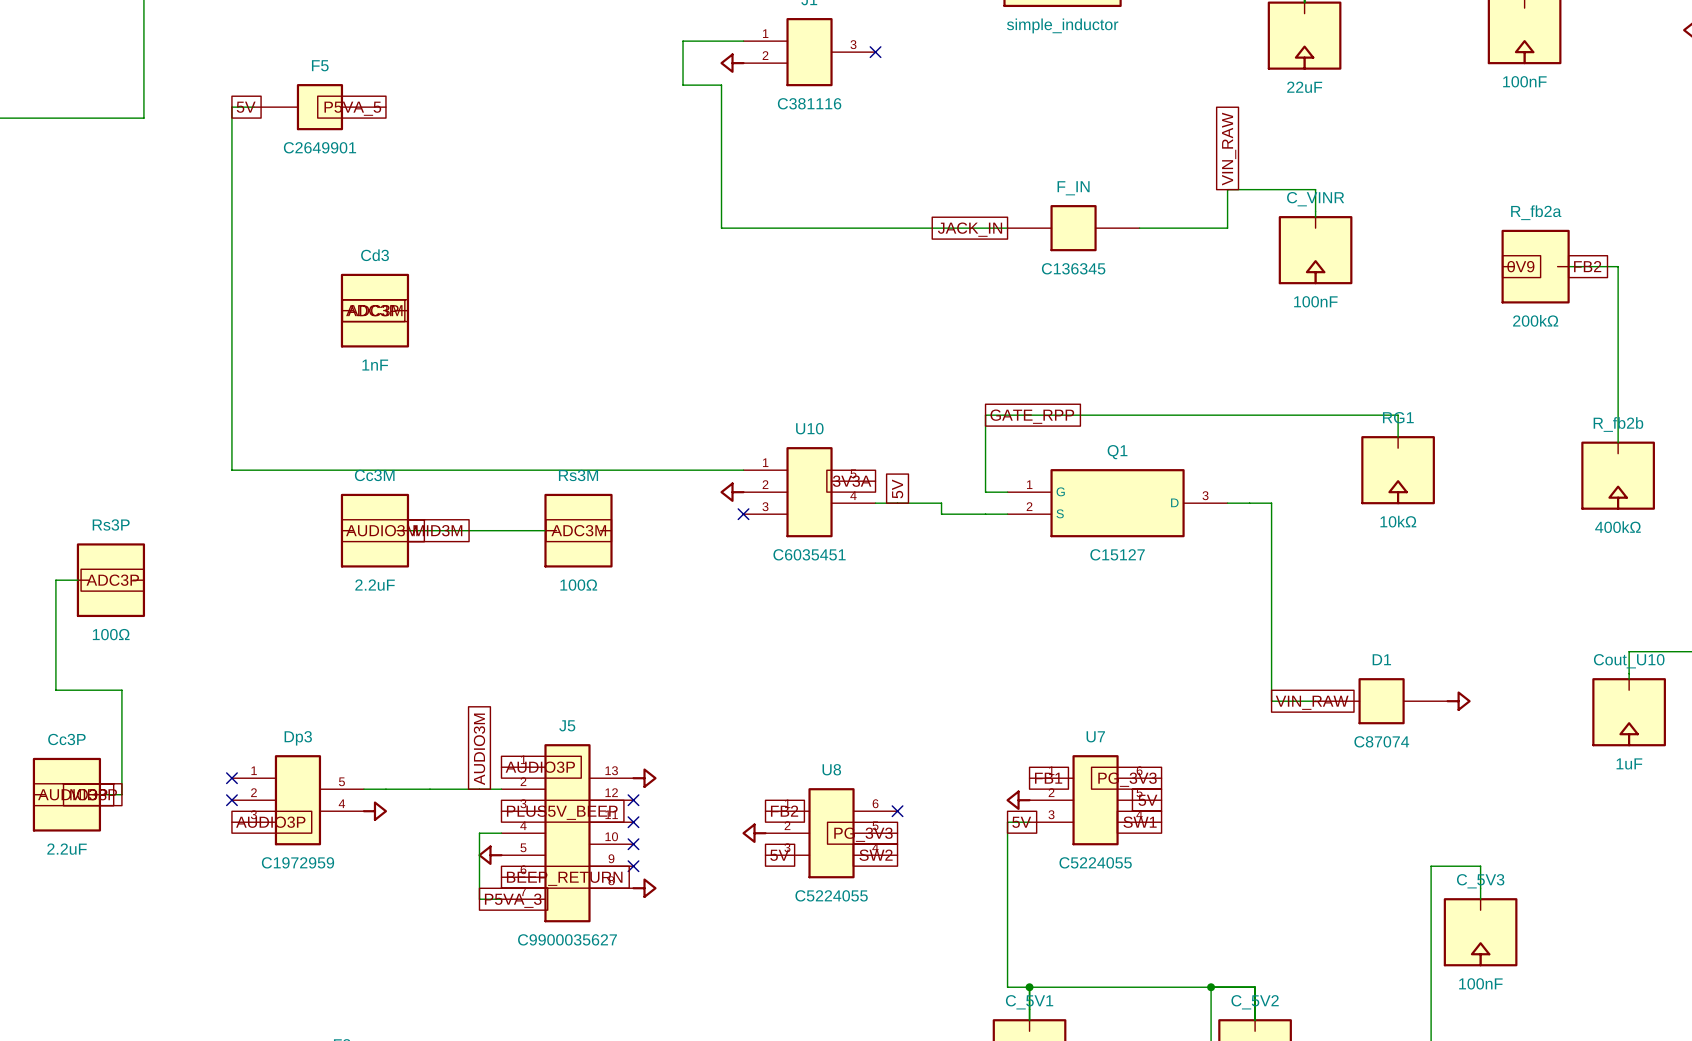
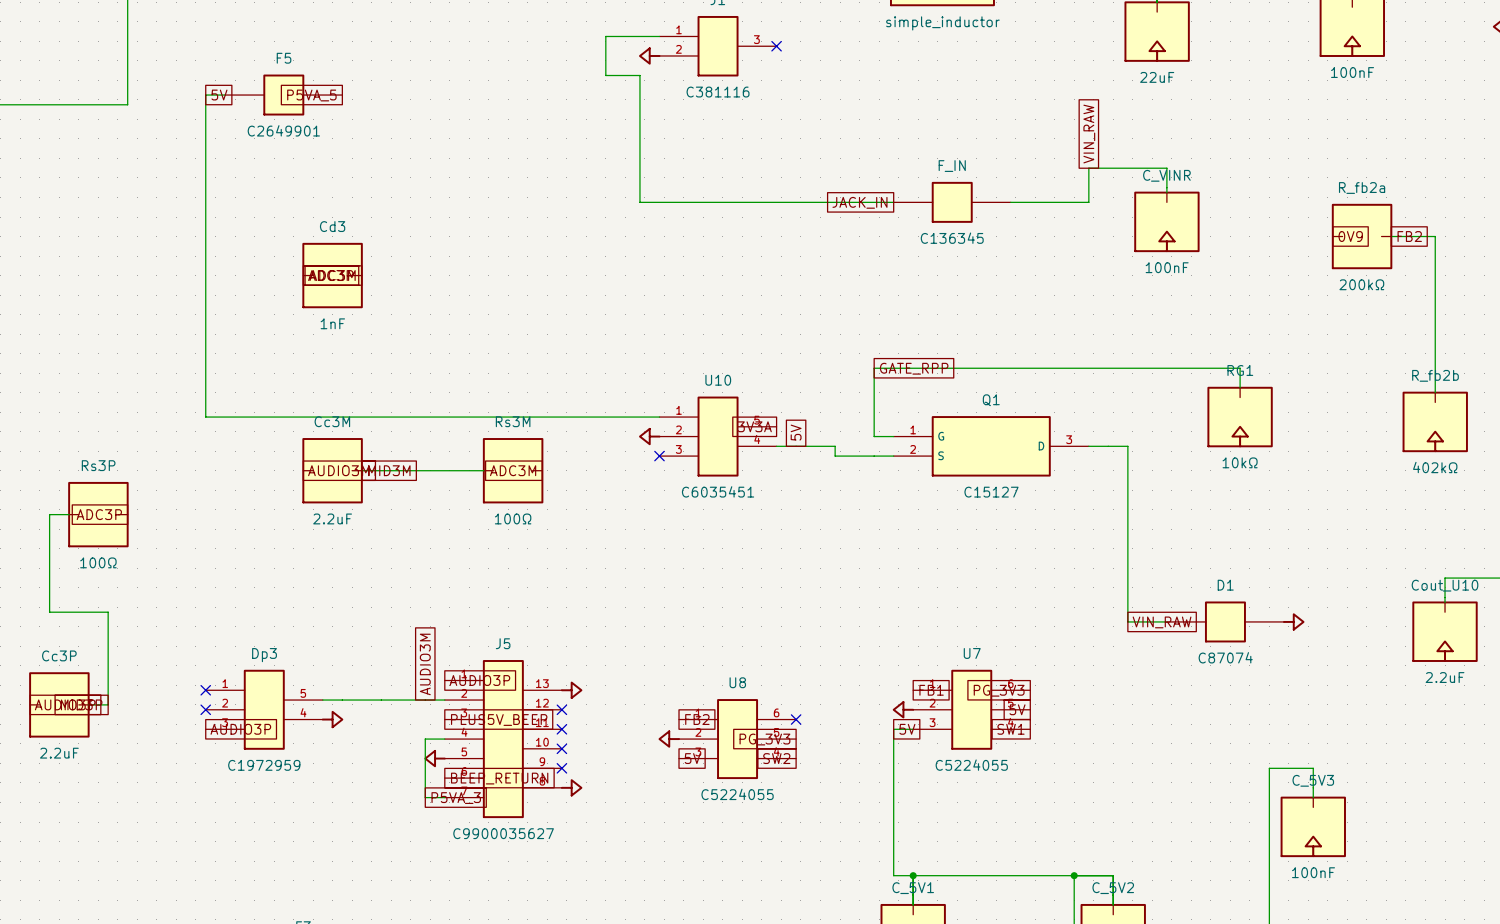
R_fb2b value: 400kΩ (1617, 527) -> 402kΩ (1435, 467)
Cout_U10 value: 1uF (1629, 763) -> 2.2uF (1445, 677)

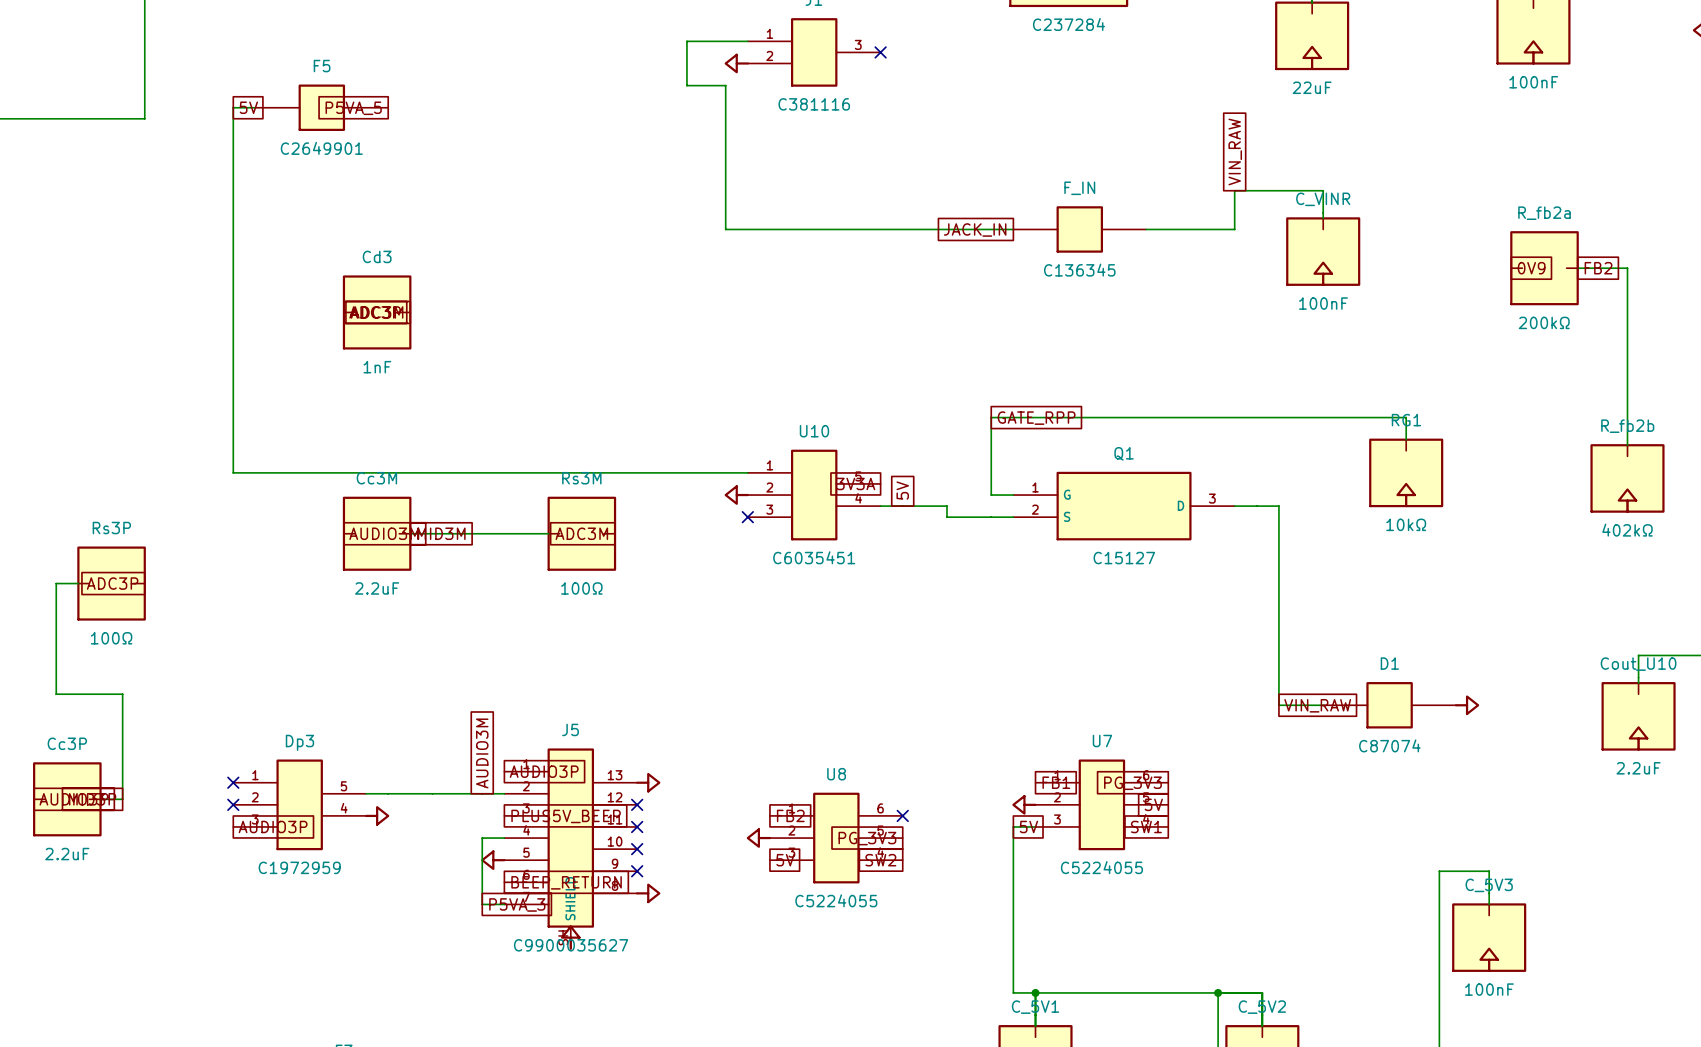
part value: simple_inductor (942, 23) -> C237284 (1068, 24)
J5 symbol: [444, 660, 562, 819] -> [504, 748, 638, 949]
power symbol: none -> (570, 937)

